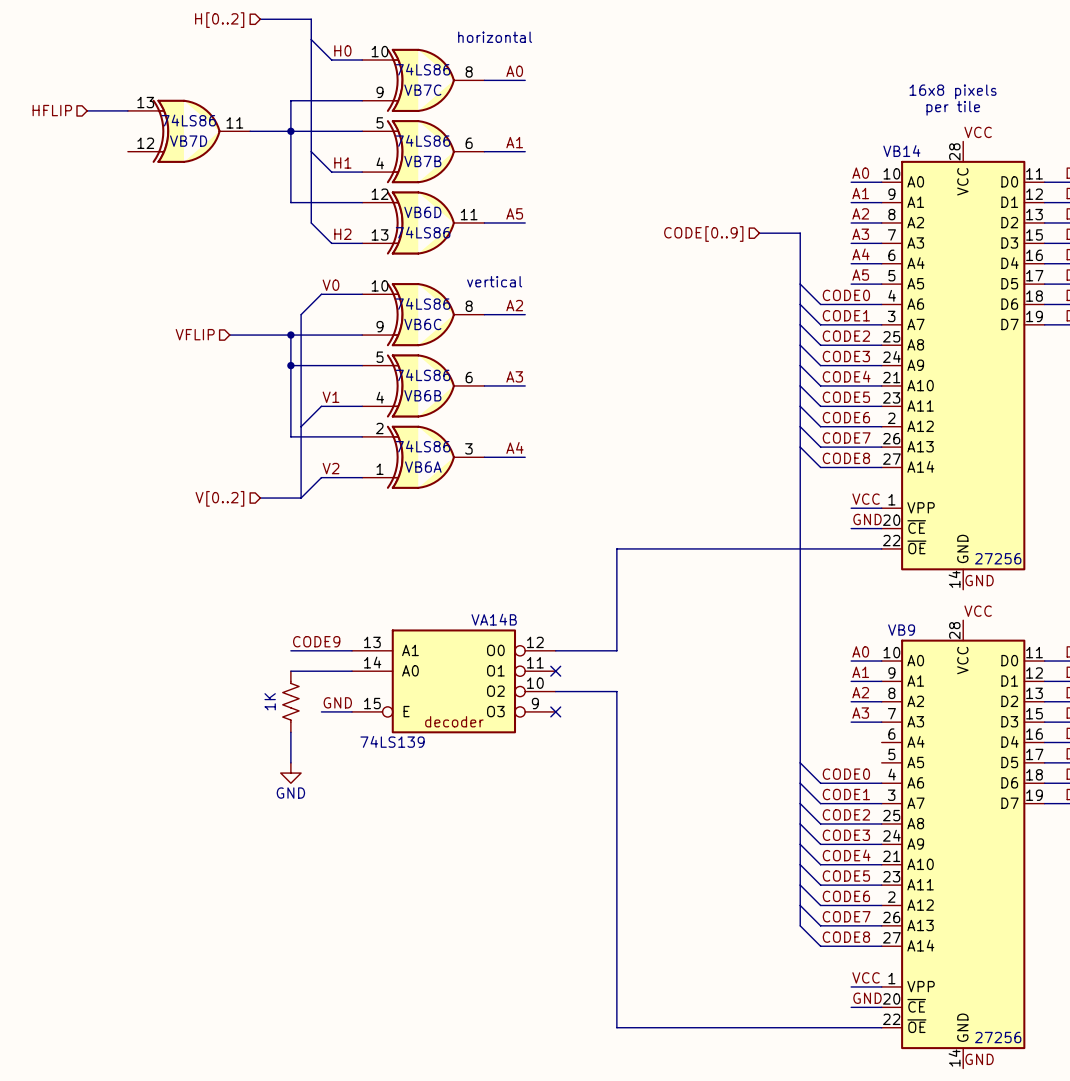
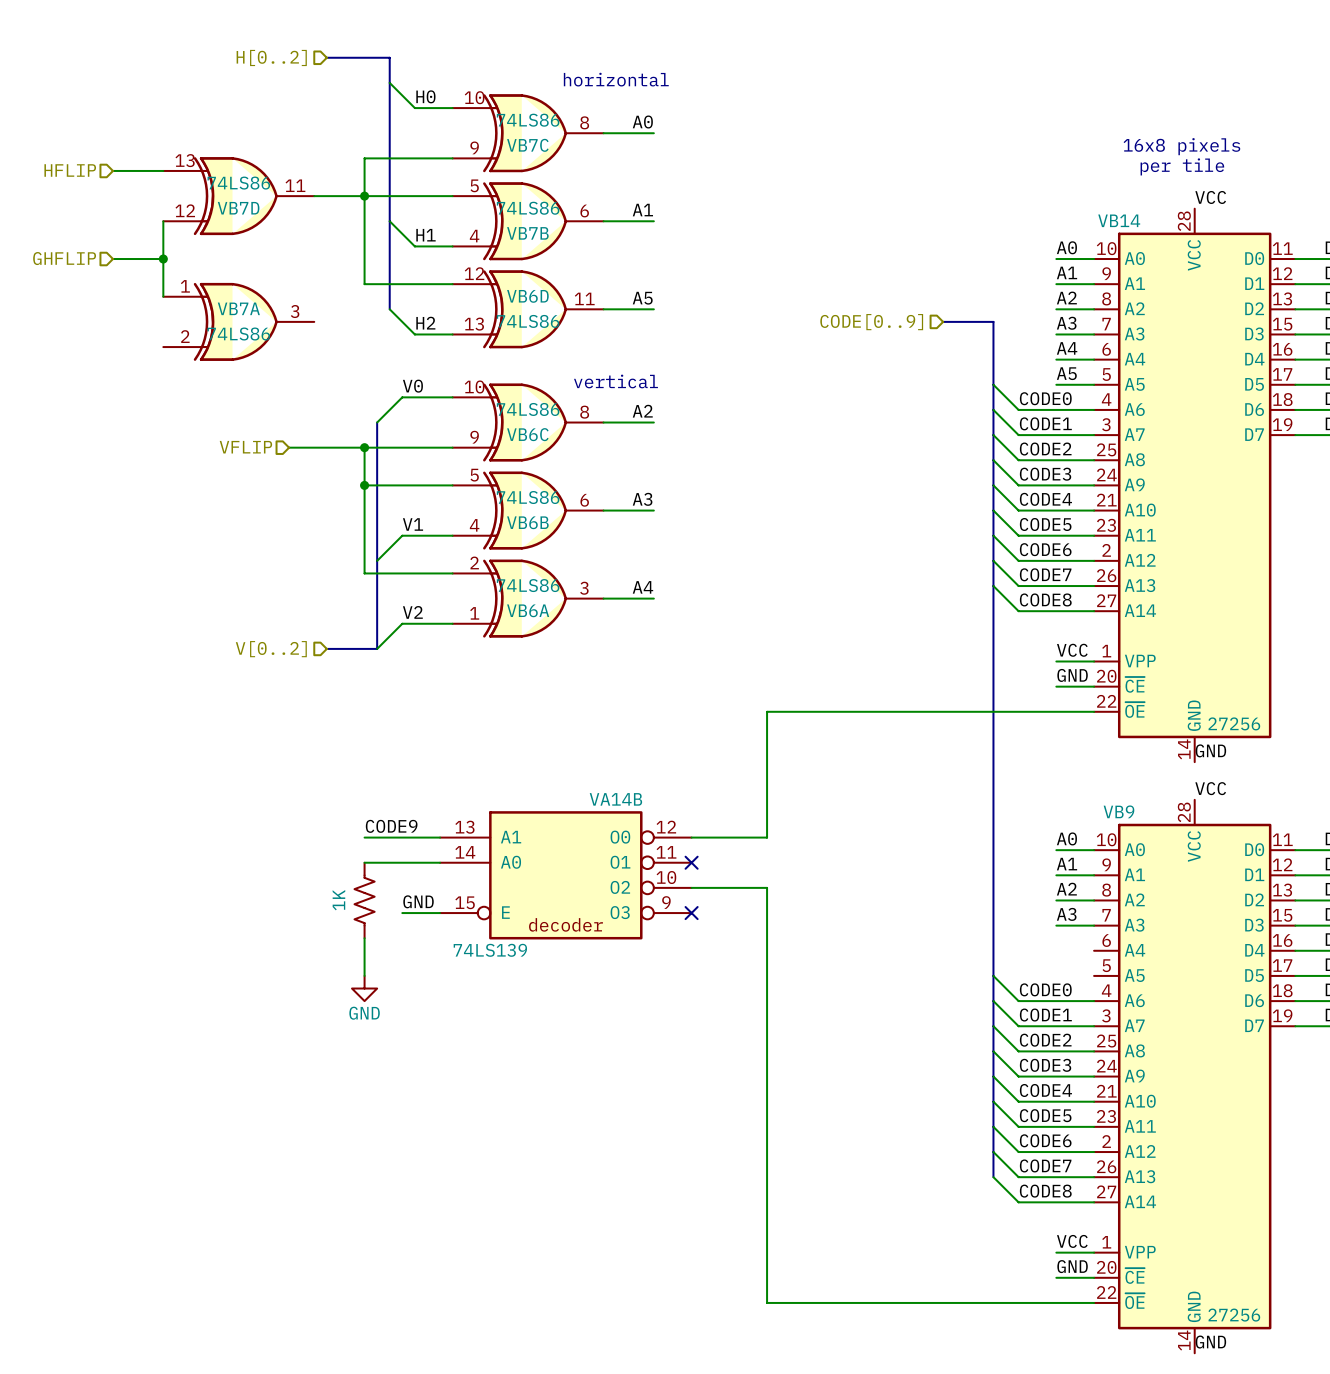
wire: none -> (163, 221) (163, 296)
hierarchical label: none -> GHFLIP (64, 258)
wire: none -> (113, 259) (163, 259)
junction: none -> (163, 259)
VB7A: none -> 74LS86 (238, 321)

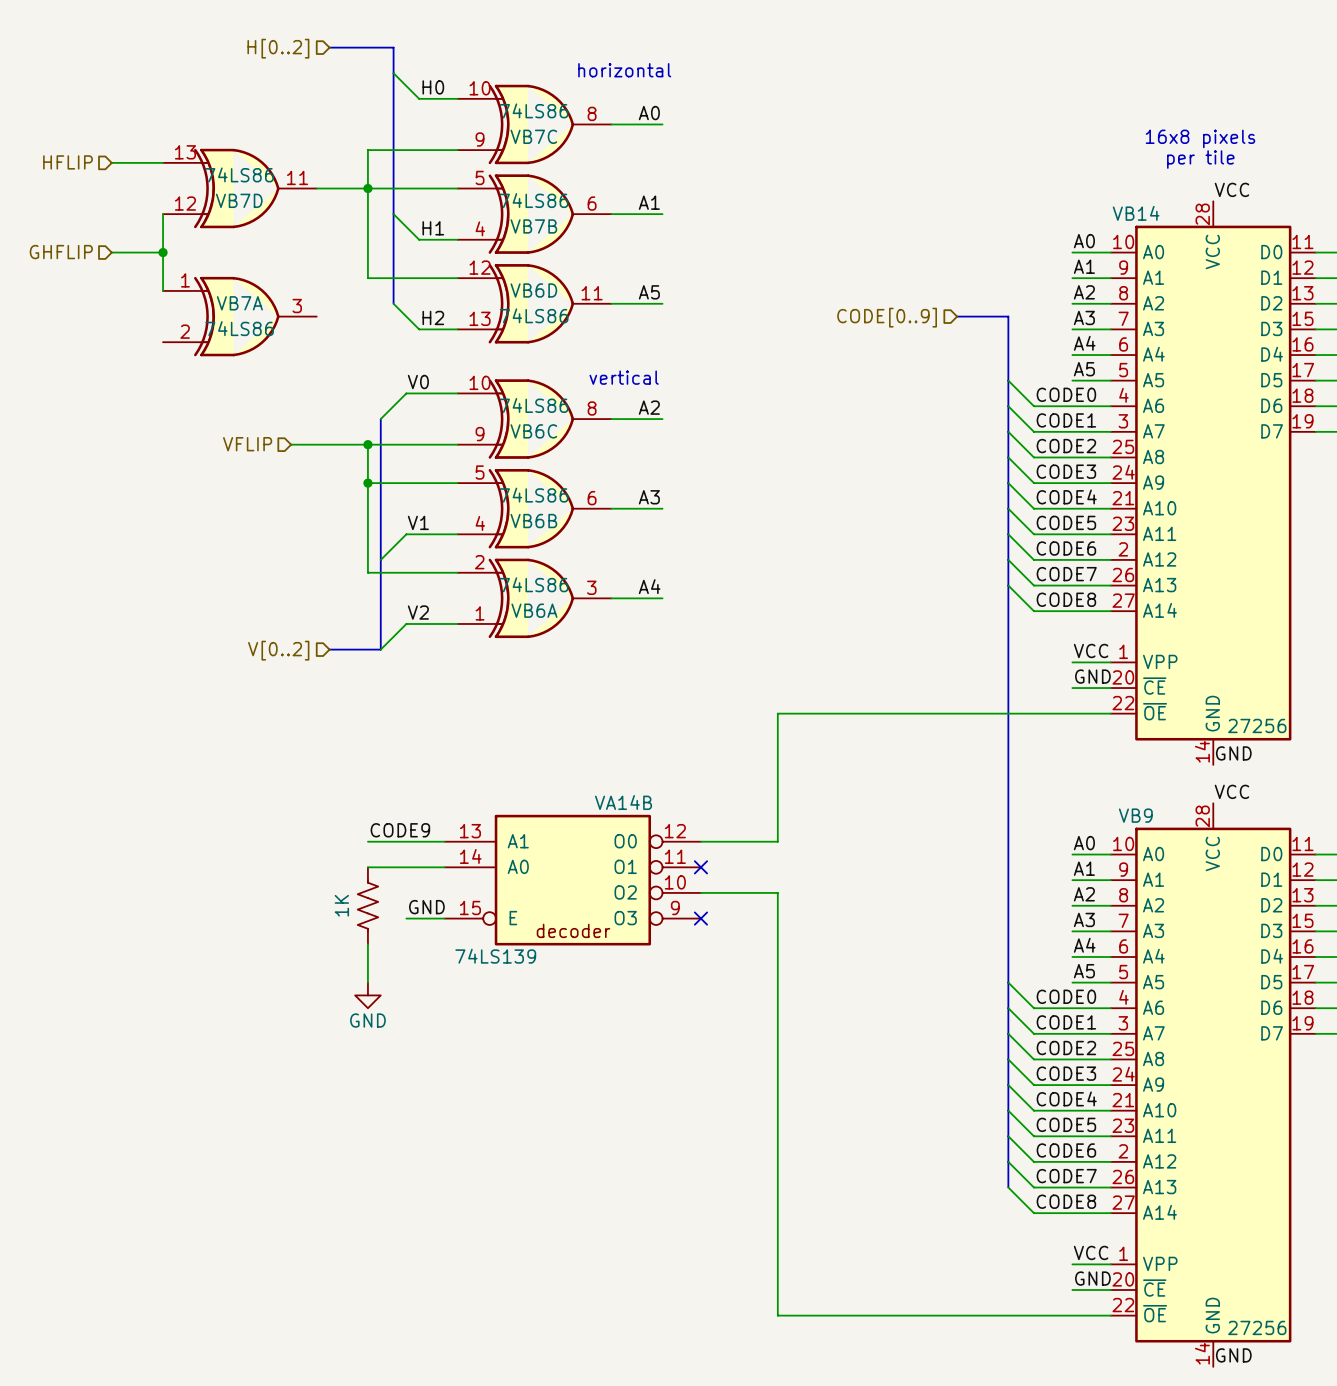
label: none -> A4 (1084, 945)
wire: none -> (1072, 956) (1110, 956)
label: none -> A5 (1084, 971)
wire: none -> (1072, 982) (1110, 982)

